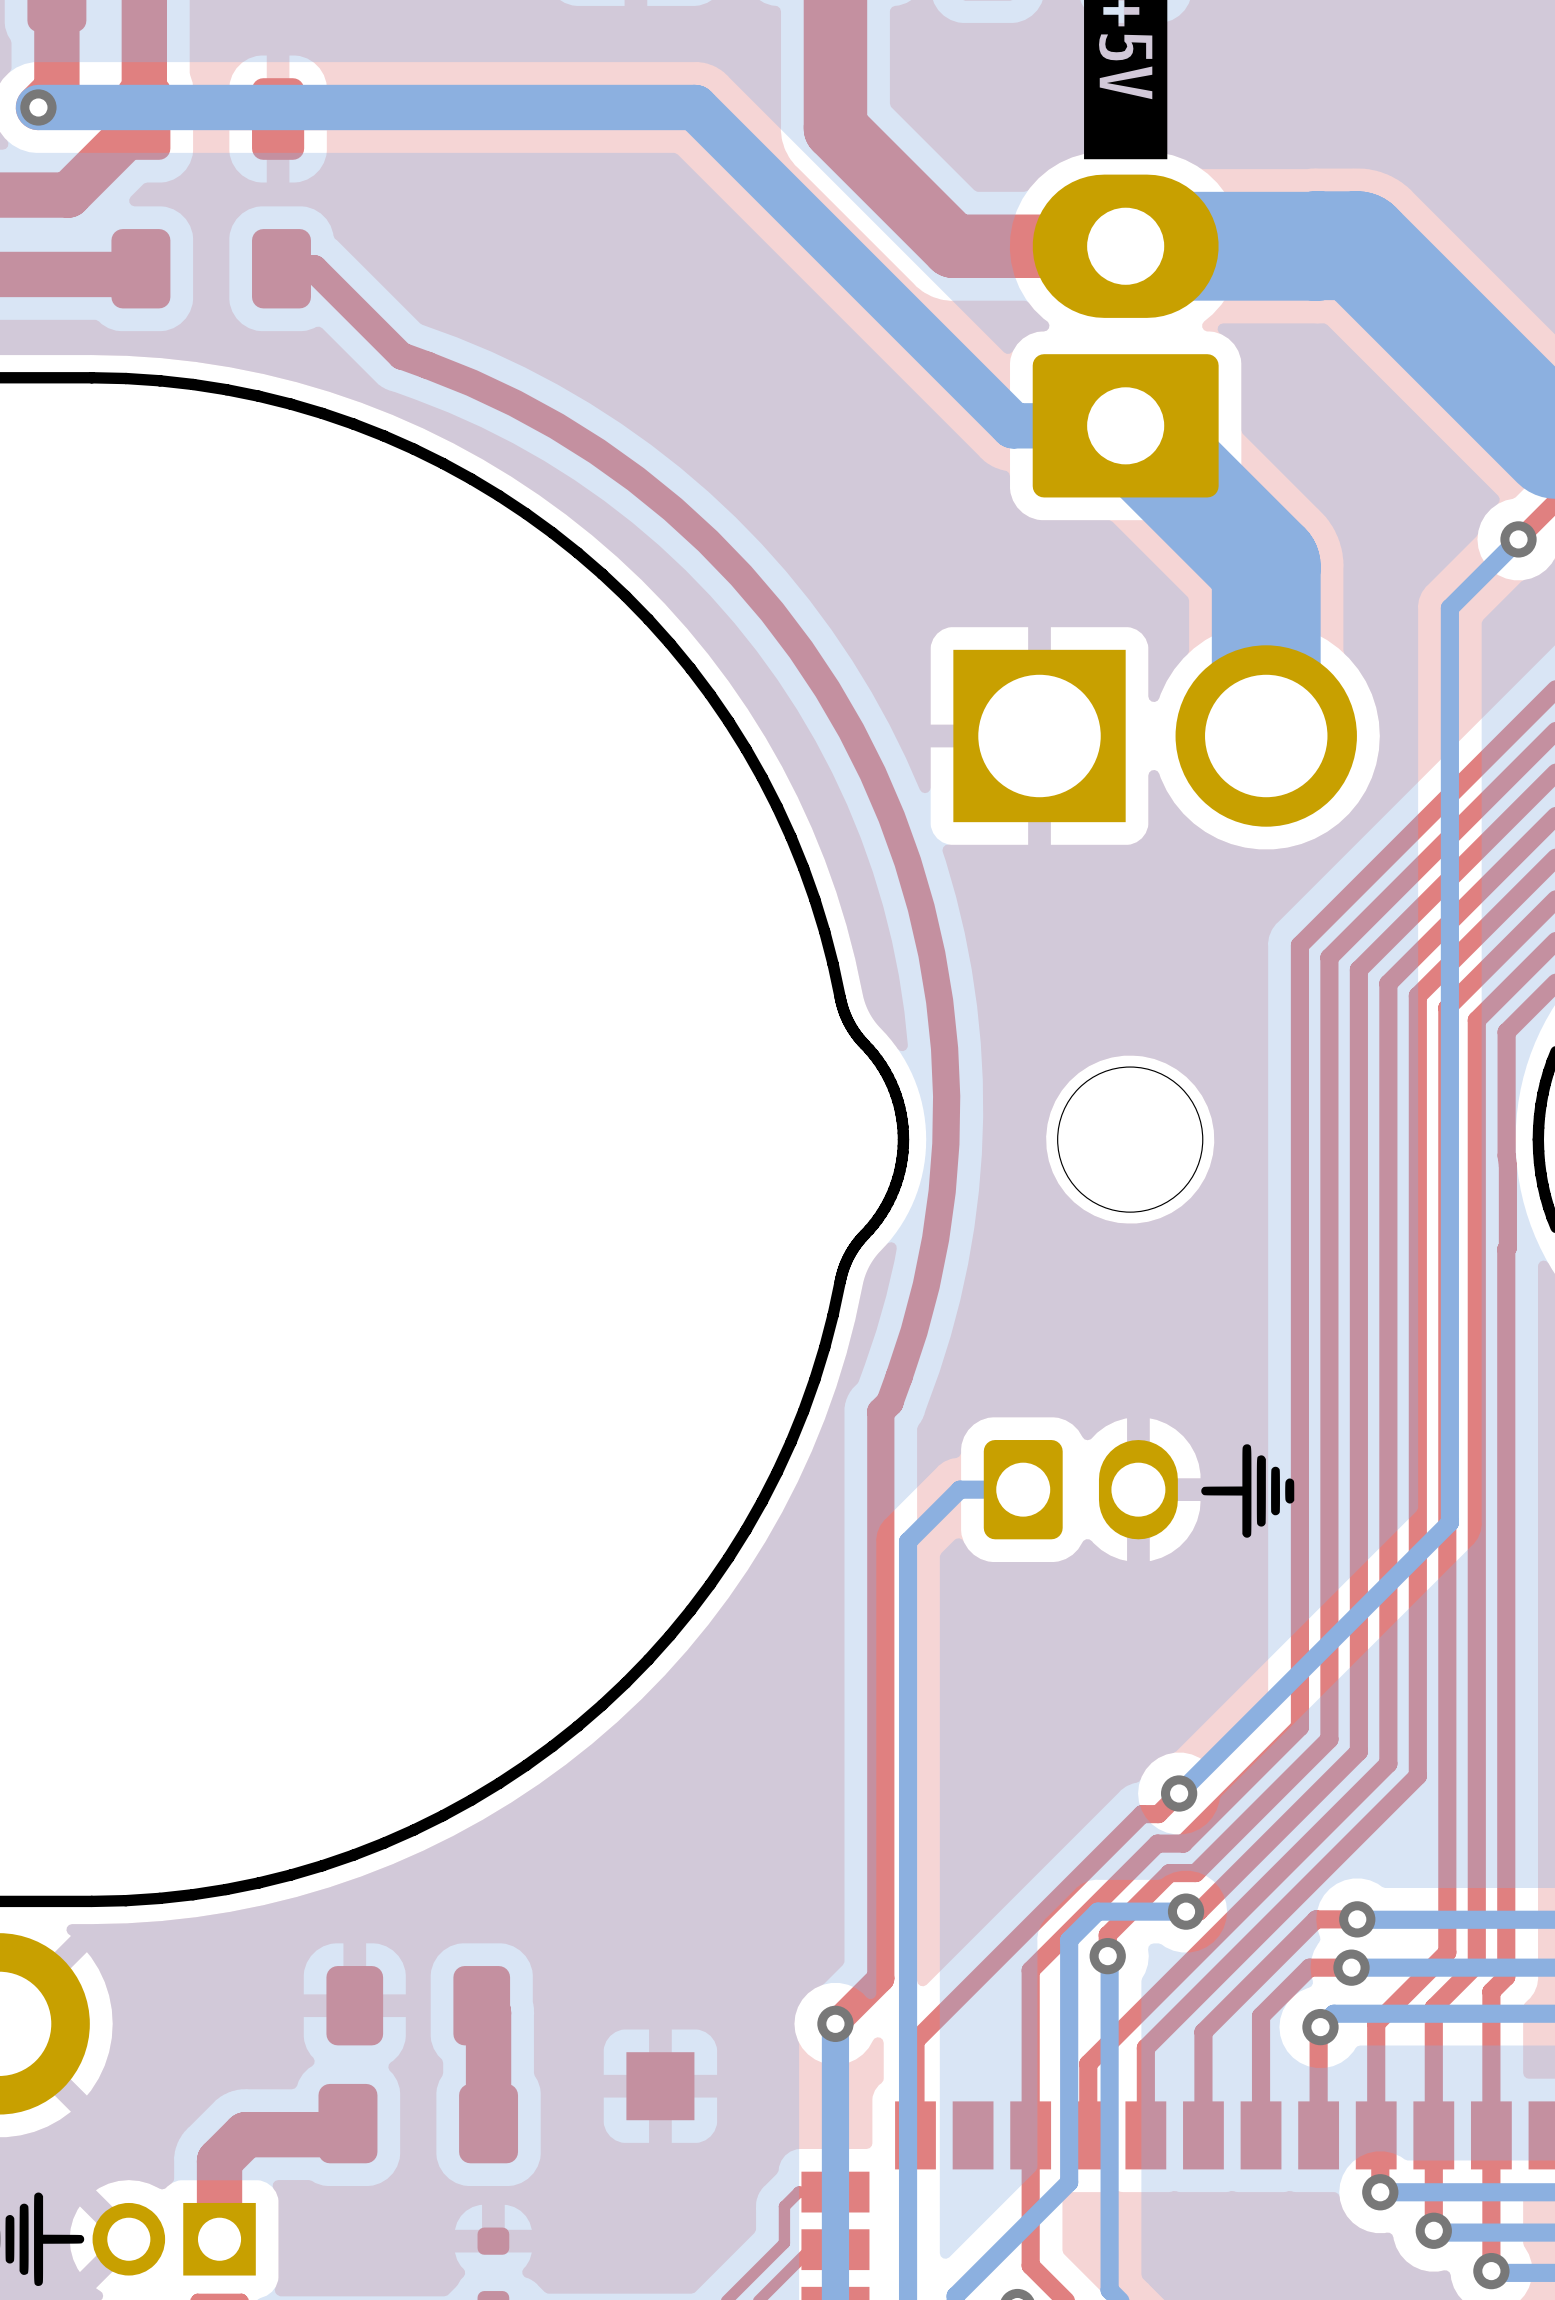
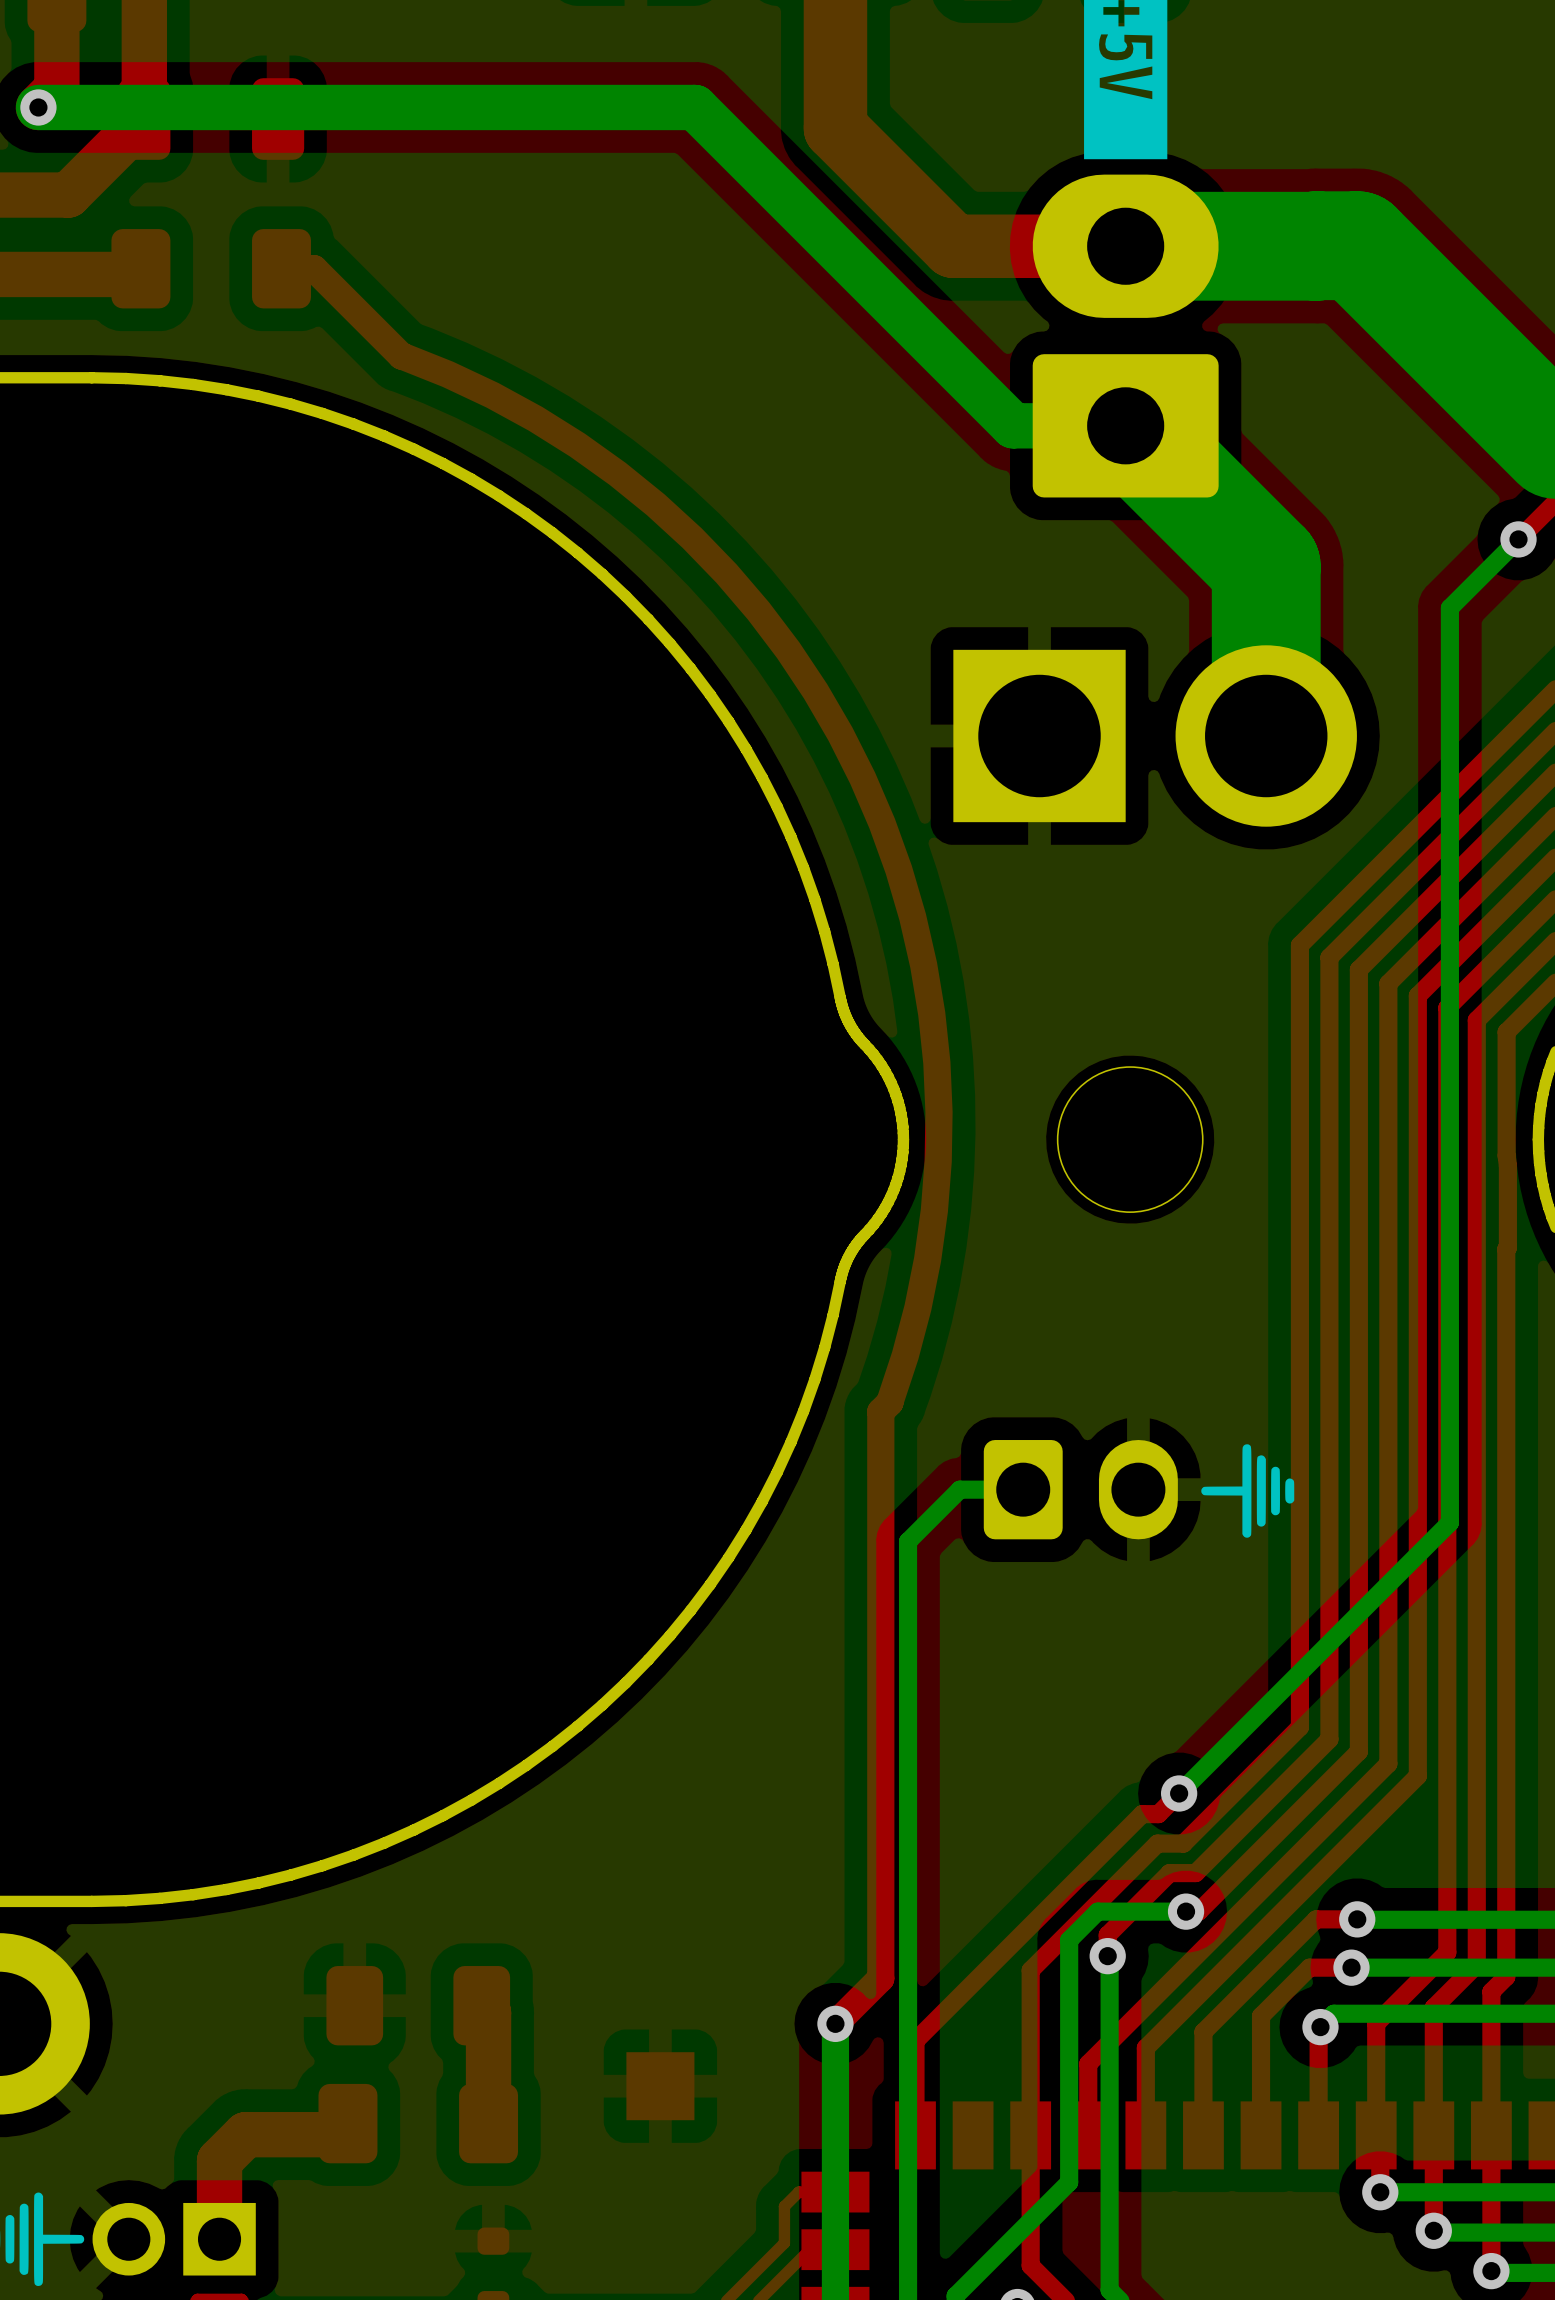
top track: (402, 356) (471, 382) (556, 426) (635, 479) (672, 509) (741, 575) (800, 649) (851, 730) (872, 773) (907, 861) (931, 954) (944, 1048) (946, 1096) (942, 1191) (935, 1238) (914, 1331) (889, 1402) -> (402, 356) (447, 374) (535, 418) (617, 473) (655, 504) (726, 573) (758, 611) (815, 691) (862, 778) (898, 869) (923, 965) (931, 1013) (939, 1112) (934, 1210) (927, 1259) (905, 1355) (889, 1402)

